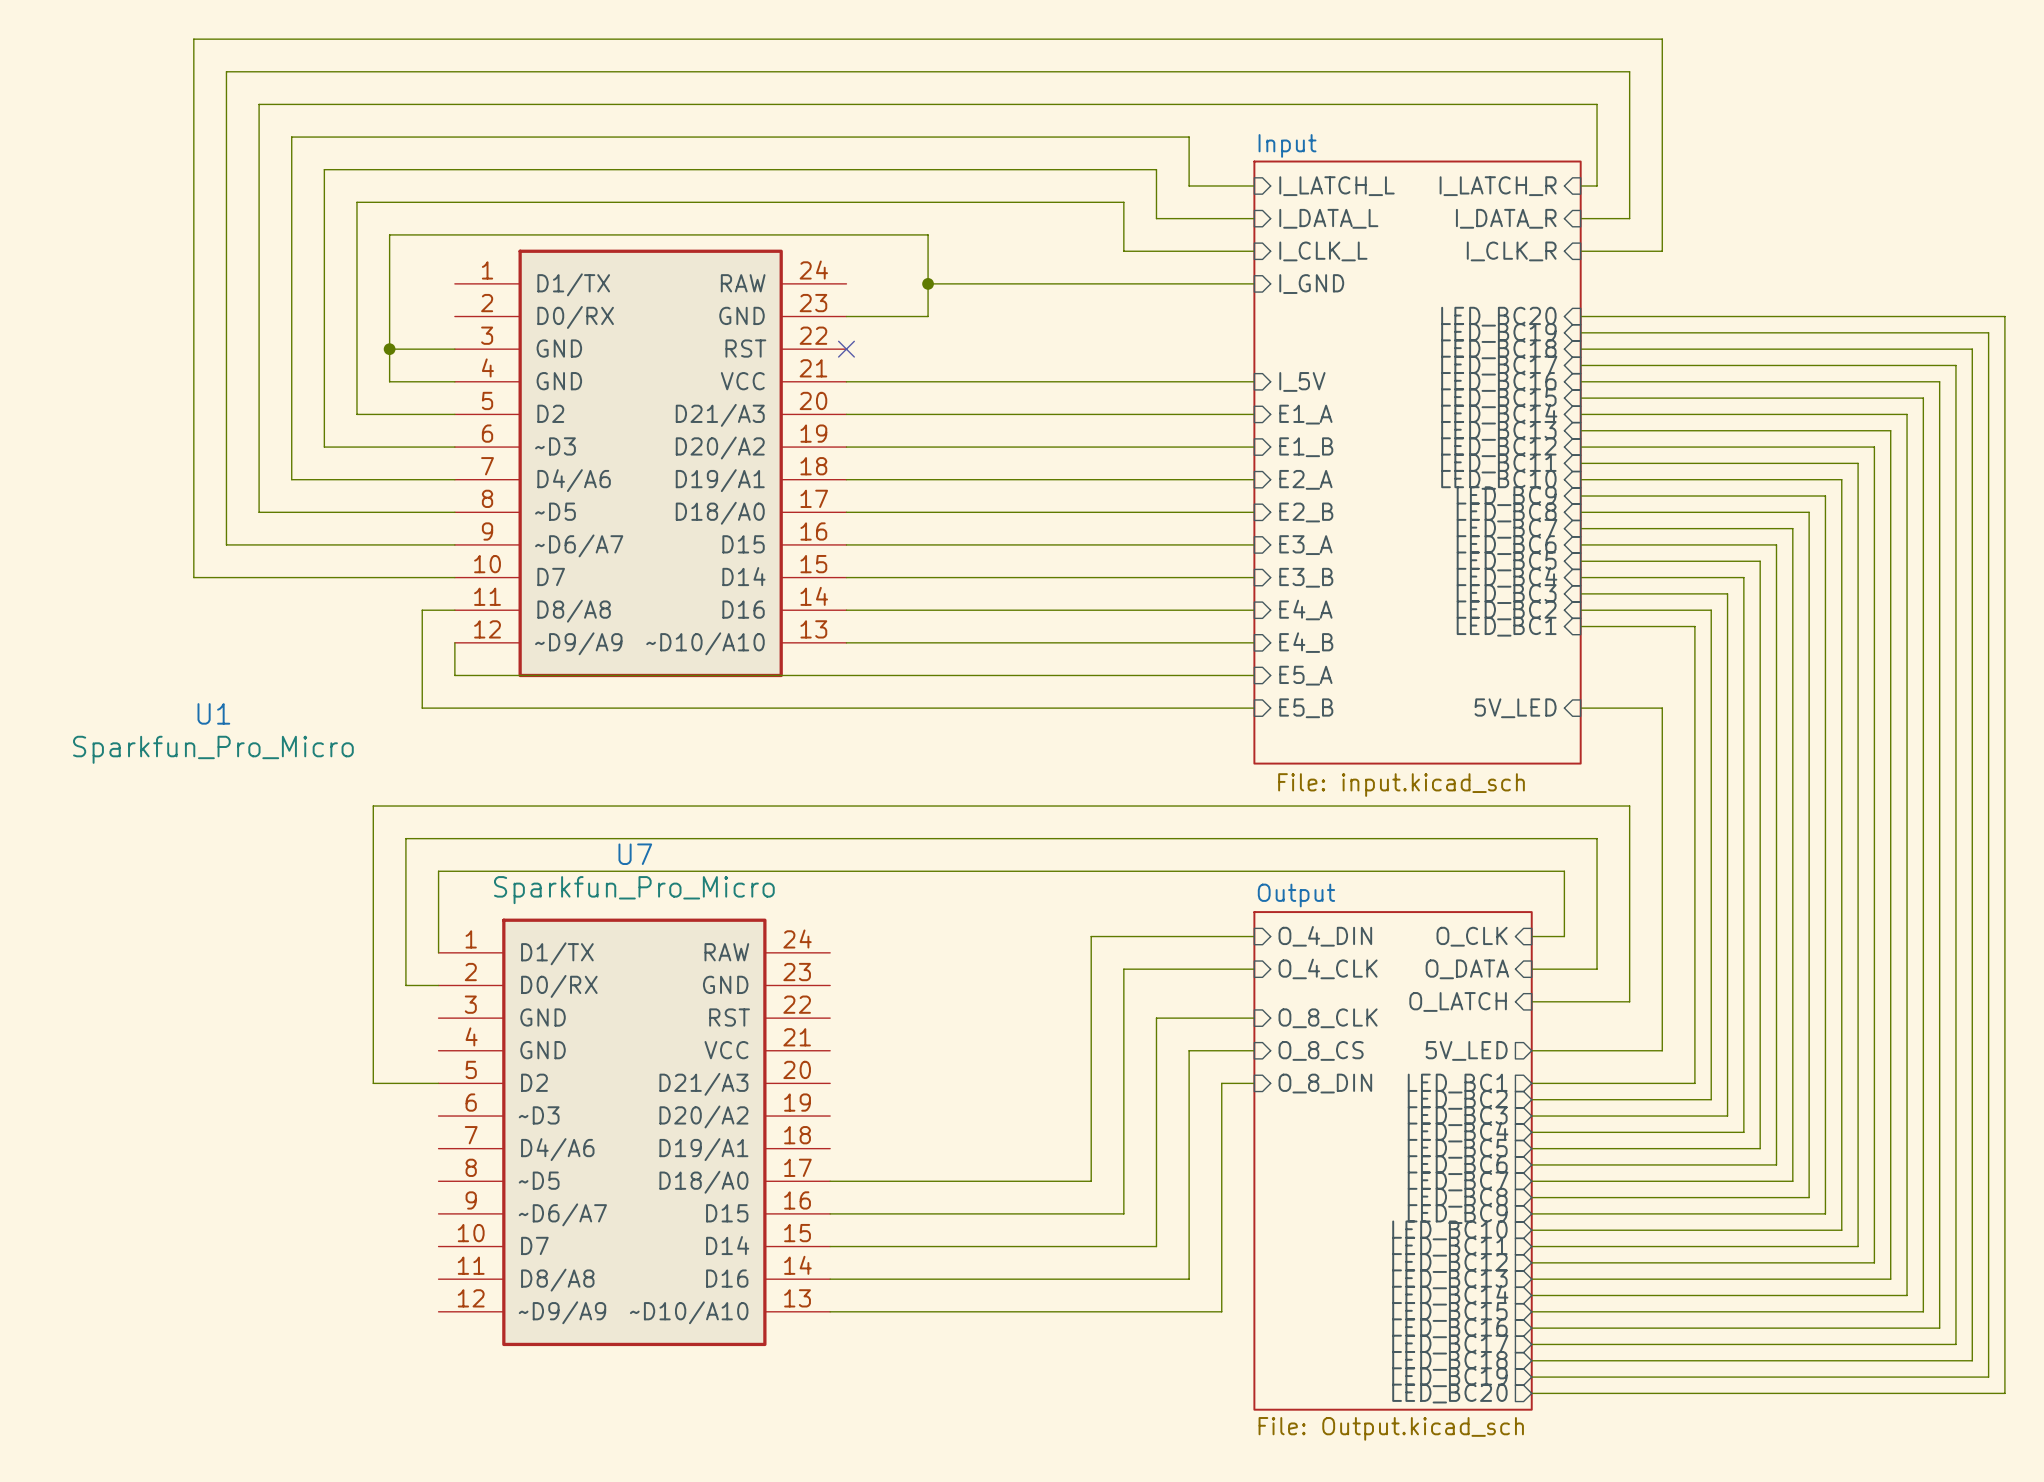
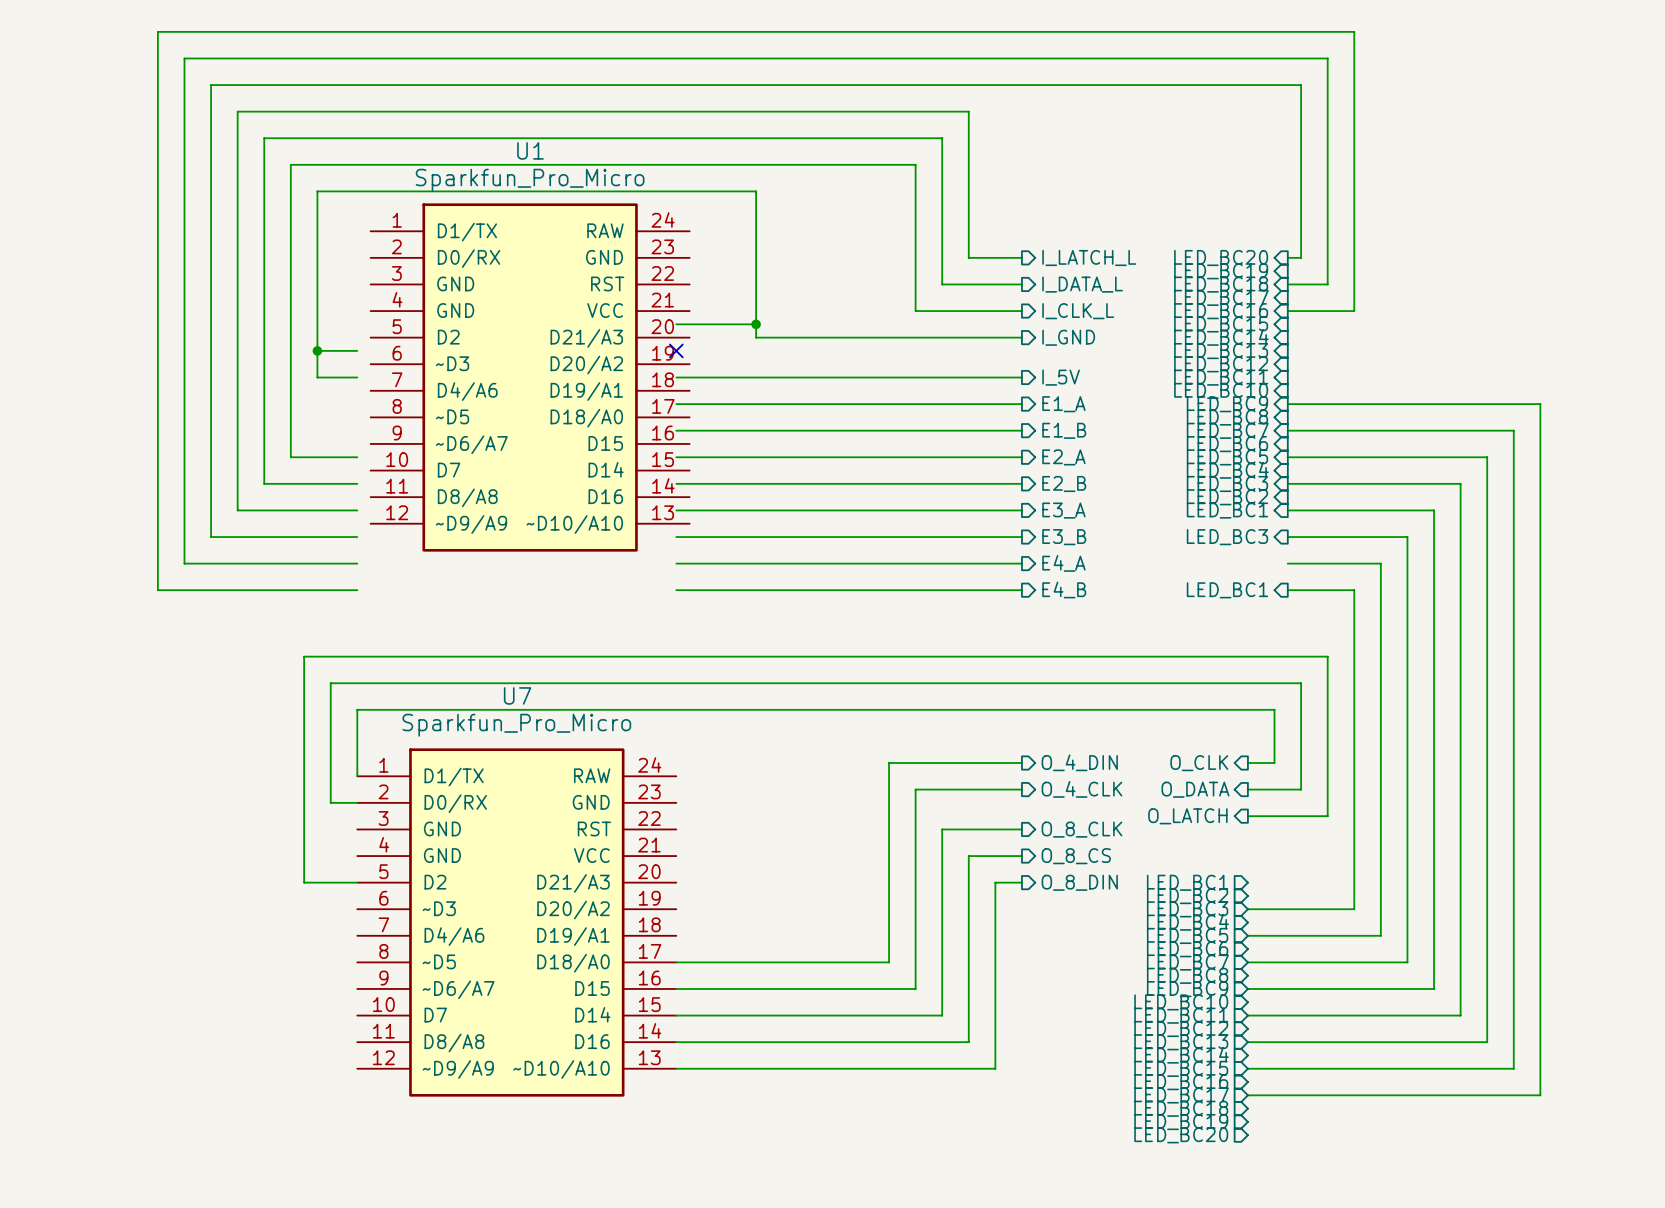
wire: (1189, 185) (1254, 185) -> (968, 151) (968, 257) (1021, 257)
wire: (1580, 185) (1597, 185) -> (1301, 257) (1301, 151)
sheet pin position: I_LATCH_L (1336, 186) -> I_LATCH_L (1089, 258)
sheet pin: I_LATCH_R (1498, 186) -> none
wire: (1156, 218) (1254, 218) -> (942, 178) (942, 284) (1021, 284)
sheet pin position: I_DATA_L (1328, 218) -> I_DATA_L (1082, 284)
sheet pin: I_DATA_R (1506, 218) -> none
wire: (1580, 218) (1629, 218) -> (1327, 284) (1327, 178)
wire: (1123, 251) (1254, 251) -> (915, 204) (915, 311)
sheet pin: I_CLK_L (1323, 251) -> none
sheet pin: I_CLK_R (1511, 251) -> none
wire: (1580, 251) (1662, 251) -> (1354, 311) (1354, 204)
wire: (928, 283) (1254, 283) -> none
junction: (928, 283) -> none
sheet pin: I_GND (1311, 284) -> none
wire: (846, 316) (928, 316) -> (756, 337) (756, 257)
wire: (1597, 316) (2004, 316) (2004, 1393) (1531, 1393) -> none
wire: (1580, 332) (1988, 332) (1988, 1377) (1531, 1377) -> none
wire: (389, 349) (454, 349) -> none
junction: (389, 349) -> none
no-connect mark: (846, 349) -> none
wire: (1629, 349) (1972, 349) (1972, 1360) (1531, 1360) -> none
wire: (1580, 365) (1955, 365) (1955, 1344) (1890, 1344) -> none
wire: (389, 381) (454, 381) -> (317, 311) (317, 377) (357, 377)
wire: (846, 381) (1123, 381) -> none
sheet pin: I_5V (1302, 381) -> I_CLK_L (1078, 311)
wire: (1662, 381) (1939, 381) (1939, 1328) (1531, 1328) -> none
wire: none -> (676, 324) (756, 324)
junction: none -> (756, 324)
wire: (1580, 398) (1923, 398) (1923, 1311) (1858, 1311) -> none
wire: (356, 414) (454, 414) -> (290, 337) (290, 457) (357, 457)
wire: (846, 414) (928, 414) -> none
sheet pin: E1_A (1305, 414) -> I_GND (1068, 337)
wire: (1580, 414) (1907, 414) (1907, 1295) (1531, 1295) -> none
wire: none -> (317, 350) (357, 350)
junction: none -> (317, 350)
no-connect mark: none -> (676, 350)
wire: (1580, 430) (1890, 430) (1890, 496) -> (1487, 404) (1540, 404)
wire: (324, 447) (454, 447) -> (264, 364) (264, 483) (357, 483)
wire: (846, 447) (1254, 447) -> none
sheet pin position: E1_B (1306, 447) -> E1_B (1064, 430)
wire: (1580, 447) (1874, 447) (1874, 1262) (1531, 1262) -> none
sheet Input: File: input.kicad_sch (1417, 462) -> none
wire: none -> (676, 377) (1021, 377)
sheet pin: none -> I_5V (1061, 377)
wire: (1580, 463) (1858, 463) (1858, 528) -> (1460, 430) (1513, 430)
wire: (291, 479) (454, 479) -> (237, 390) (237, 510) (357, 510)
wire: (846, 479) (1254, 479) -> none
sheet pin position: E2_A (1305, 479) -> E2_A (1063, 457)
wire: (1580, 479) (1841, 479) (1841, 1230) (1531, 1230) -> none
wire: none -> (676, 404) (1021, 404)
sheet pin: none -> E1_A (1063, 404)
wire: (1825, 496) (1825, 561) -> (1434, 457) (1487, 457)
wire: (259, 512) (454, 512) -> (211, 417) (211, 537) (357, 537)
wire: (846, 512) (1254, 512) -> none
sheet pin position: E2_B (1306, 512) -> E2_B (1064, 483)
wire: (1580, 512) (1809, 512) (1809, 1197) (1531, 1197) -> none
wire: none -> (676, 430) (1021, 430)
wire: (1792, 528) (1792, 593) -> (1407, 483) (1460, 483)
wire: (226, 544) (454, 544) -> (184, 443) (184, 563) (357, 563)
wire: (846, 544) (1254, 544) -> none
wire: (1580, 544) (1776, 544) (1776, 1164) (1531, 1164) -> none
sheet pin position: E3_A (1305, 545) -> E3_A (1063, 510)
wire: none -> (676, 457) (1021, 457)
wire: (1760, 561) (1760, 626) -> (1380, 510) (1434, 510)
wire: (193, 577) (454, 577) -> (157, 470) (157, 590) (357, 590)
wire: (846, 577) (1254, 577) -> none
sheet pin position: E3_B (1306, 577) -> E3_B (1064, 537)
wire: (1580, 577) (1743, 577) (1743, 1132) (1531, 1132) -> none
wire: none -> (676, 483) (1021, 483)
wire: (1727, 593) (1727, 659) -> (1287, 537) (1407, 537)
sheet pin position: E4_A (1305, 609) -> E4_A (1063, 563)
wire: (454, 610) (422, 610) (422, 708) (1254, 708) -> none
wire: (846, 610) (1254, 610) -> none
wire: (1580, 610) (1711, 610) (1711, 1099) (1531, 1099) -> none
wire: none -> (676, 510) (1021, 510)
wire: (1694, 626) (1694, 691) -> (1287, 563) (1380, 563)
wire: (454, 642) (454, 675) (1254, 675) -> none
wire: (846, 642) (1254, 642) -> none
sheet pin position: E4_B (1306, 642) -> E4_B (1064, 590)
wire: none -> (676, 537) (1021, 537)
sheet pin: none -> LED_BC3 (1227, 537)
sheet pin: E5_A (1305, 675) -> none
wire: none -> (676, 563) (1021, 563)
sheet pin: E5_B (1306, 708) -> none
sheet pin: 5V_LED (1515, 708) -> none
wire: (1580, 708) (1662, 708) (1662, 724) -> (1287, 590) (1354, 590)
U1 name position: U1 (213, 713) -> U1 (530, 150)
wire: none -> (676, 590) (1021, 590)
sheet pin: none -> LED_BC1 (1227, 590)
U1 value position: Sparkfun_Pro_Micro (213, 749) -> Sparkfun_Pro_Micro (530, 180)
sheet pin: 5V_LED (1466, 1050) -> none
wire: (1531, 1050) (1662, 1050) -> none
wire: (1531, 1083) (1694, 1083) -> none
wire: (1662, 1116) (1727, 1116) -> (1354, 909) (1354, 856)
wire: (1694, 1148) (1760, 1148) -> (1380, 935) (1380, 882)
wire: none -> (1434, 935) (1434, 988)
sheet Output: File: Output.kicad_sch (1393, 1160) -> none
wire: (1727, 1181) (1792, 1181) -> (1407, 962) (1407, 909)
wire: none -> (1460, 962) (1460, 1015)
wire: (1760, 1213) (1825, 1213) -> (1487, 1042) (1487, 988)
wire: (1792, 1246) (1858, 1246) -> (1513, 1068) (1513, 1015)
wire: (1825, 1279) (1890, 1279) -> (1540, 1095) (1540, 1042)

